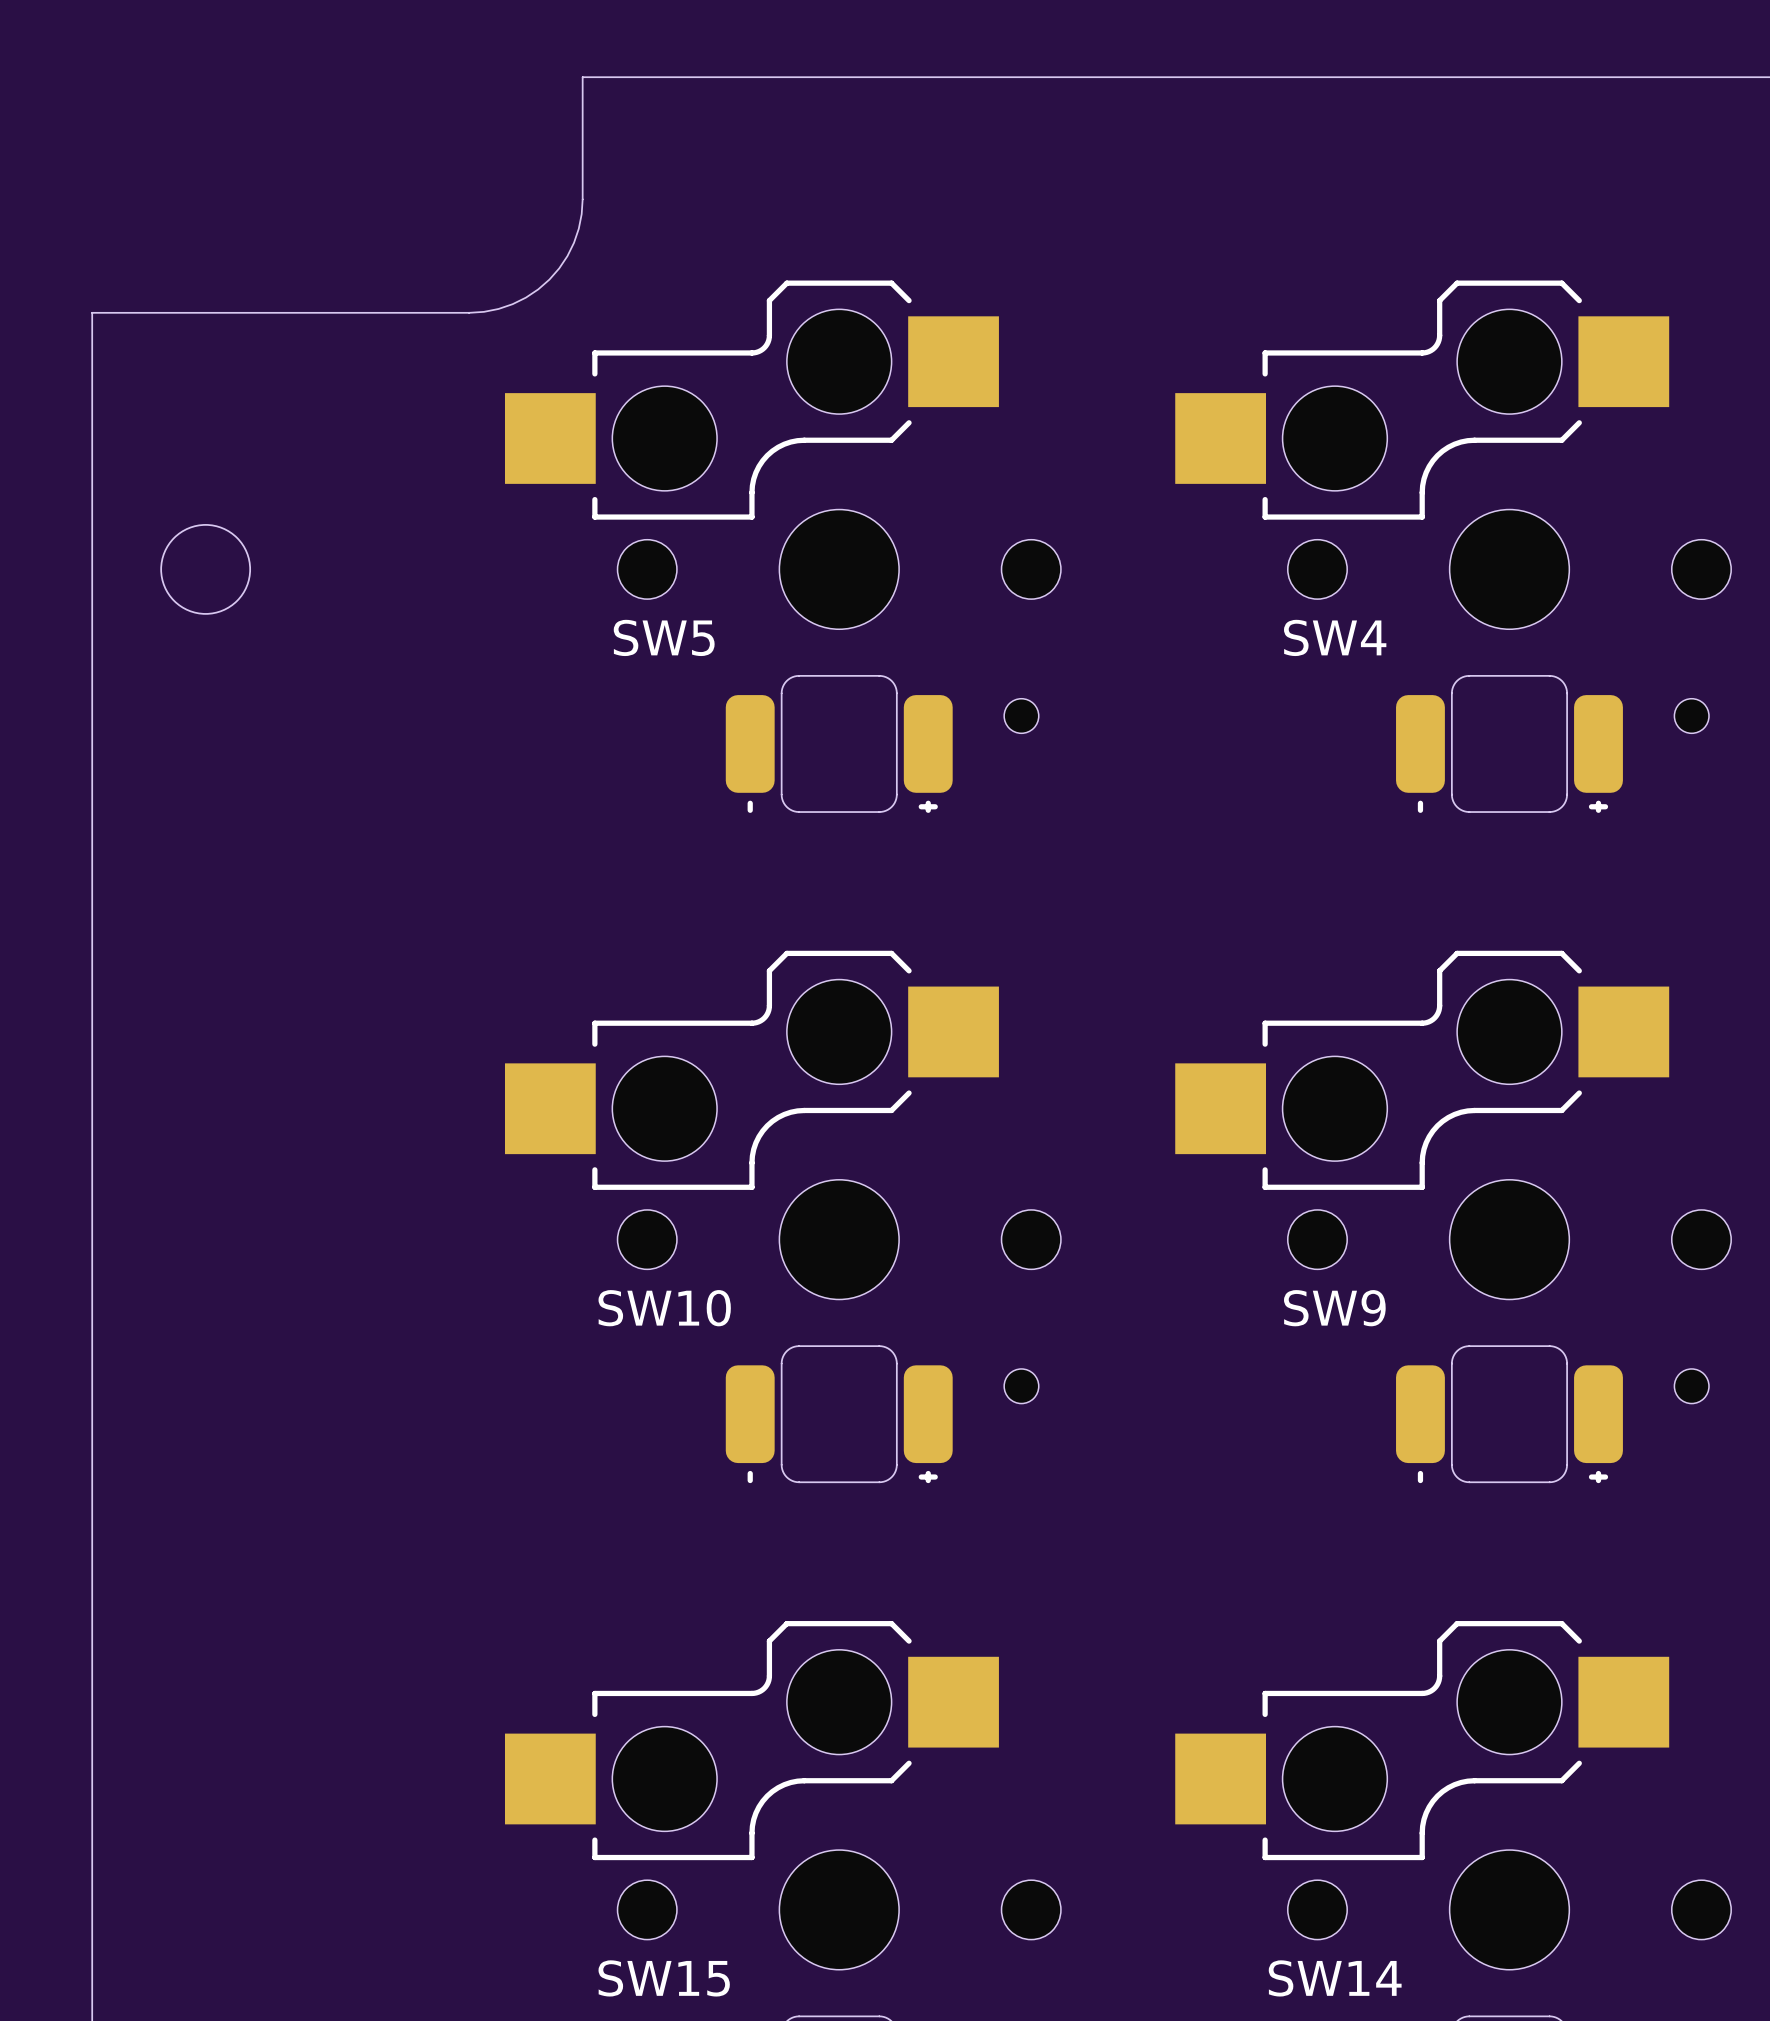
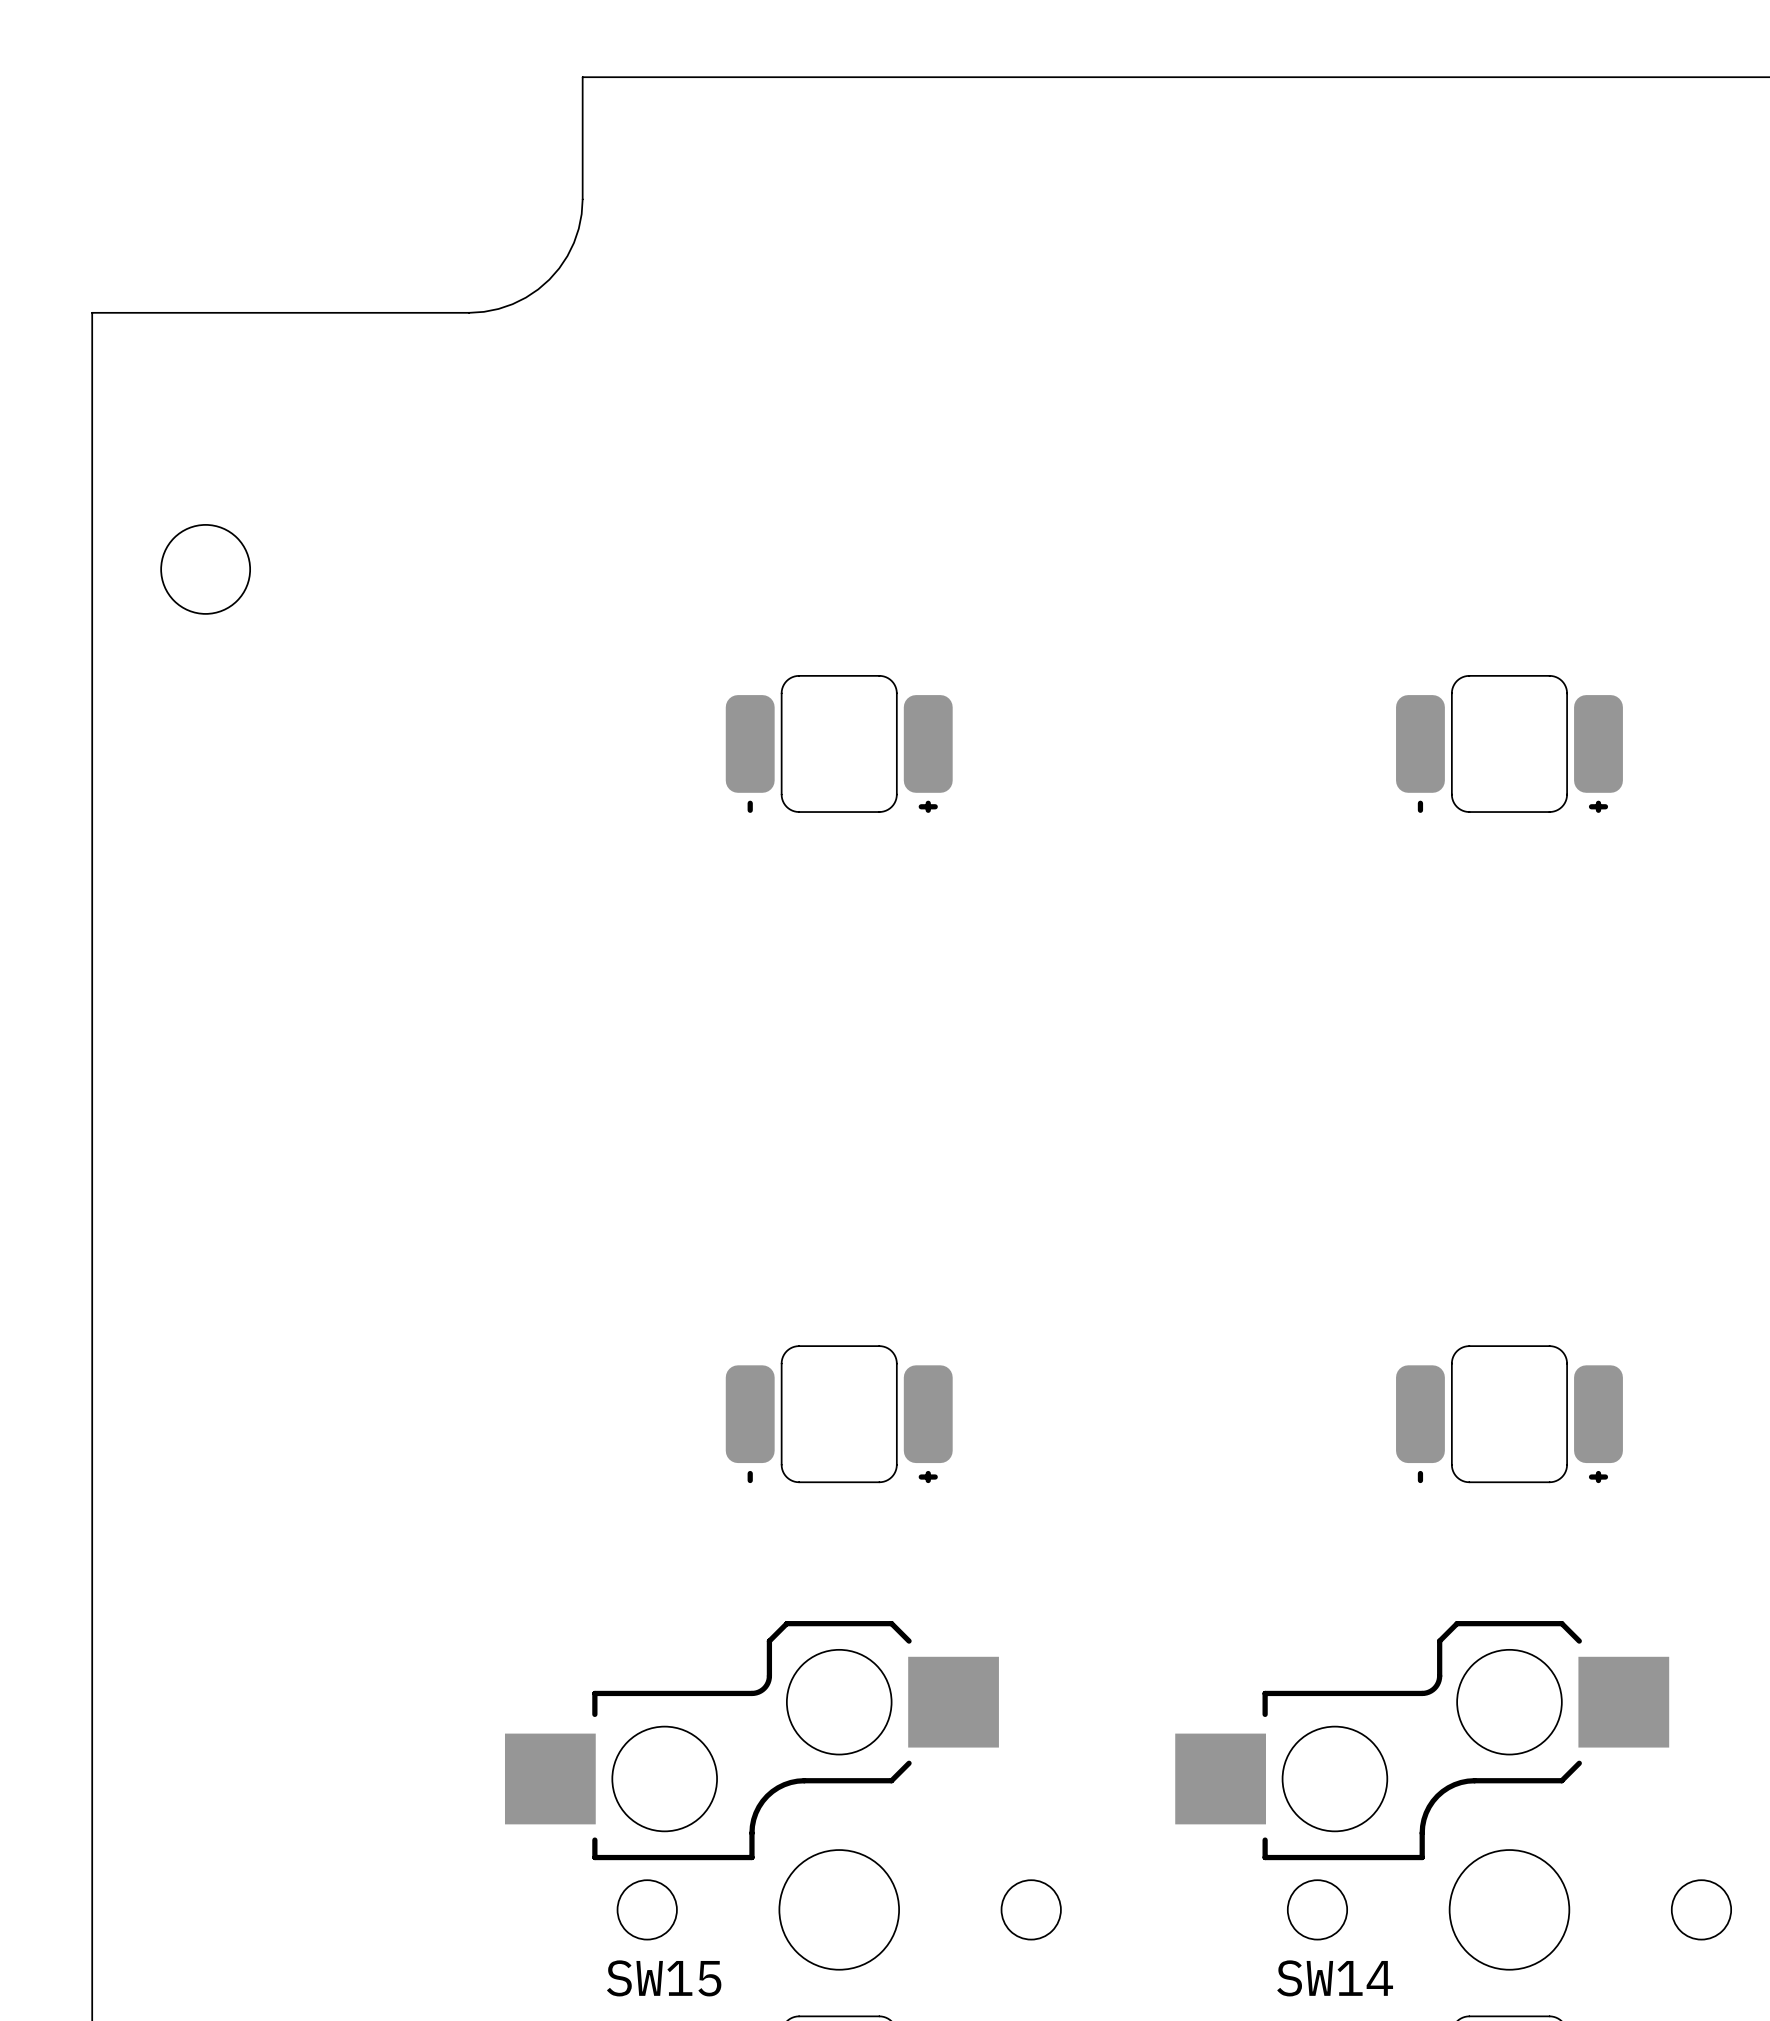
SW5: (782, 506) -> none
SW4: (1453, 506) -> none
SW10: (782, 1177) -> none
SW9: (1453, 1177) -> none

